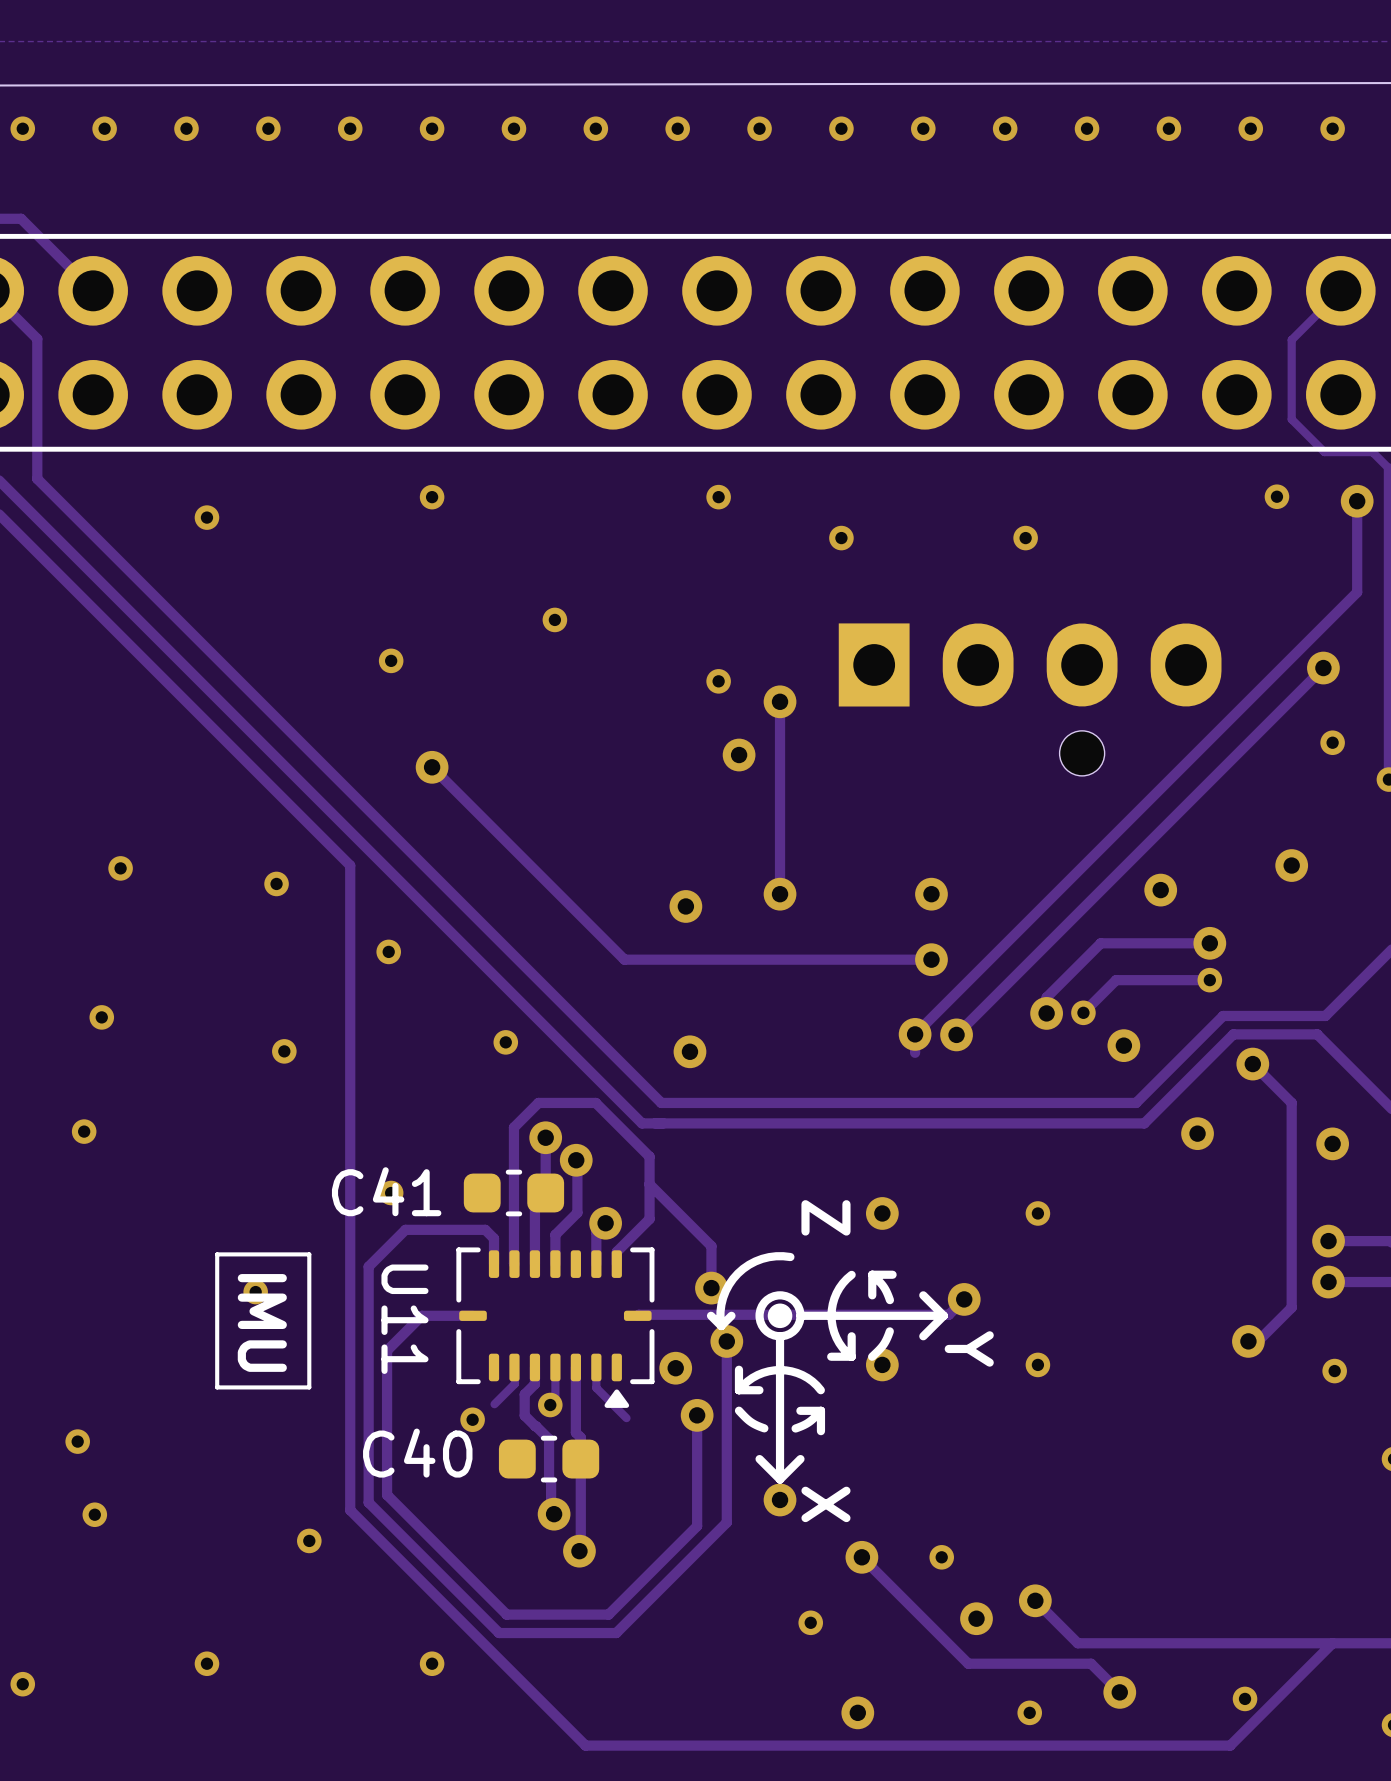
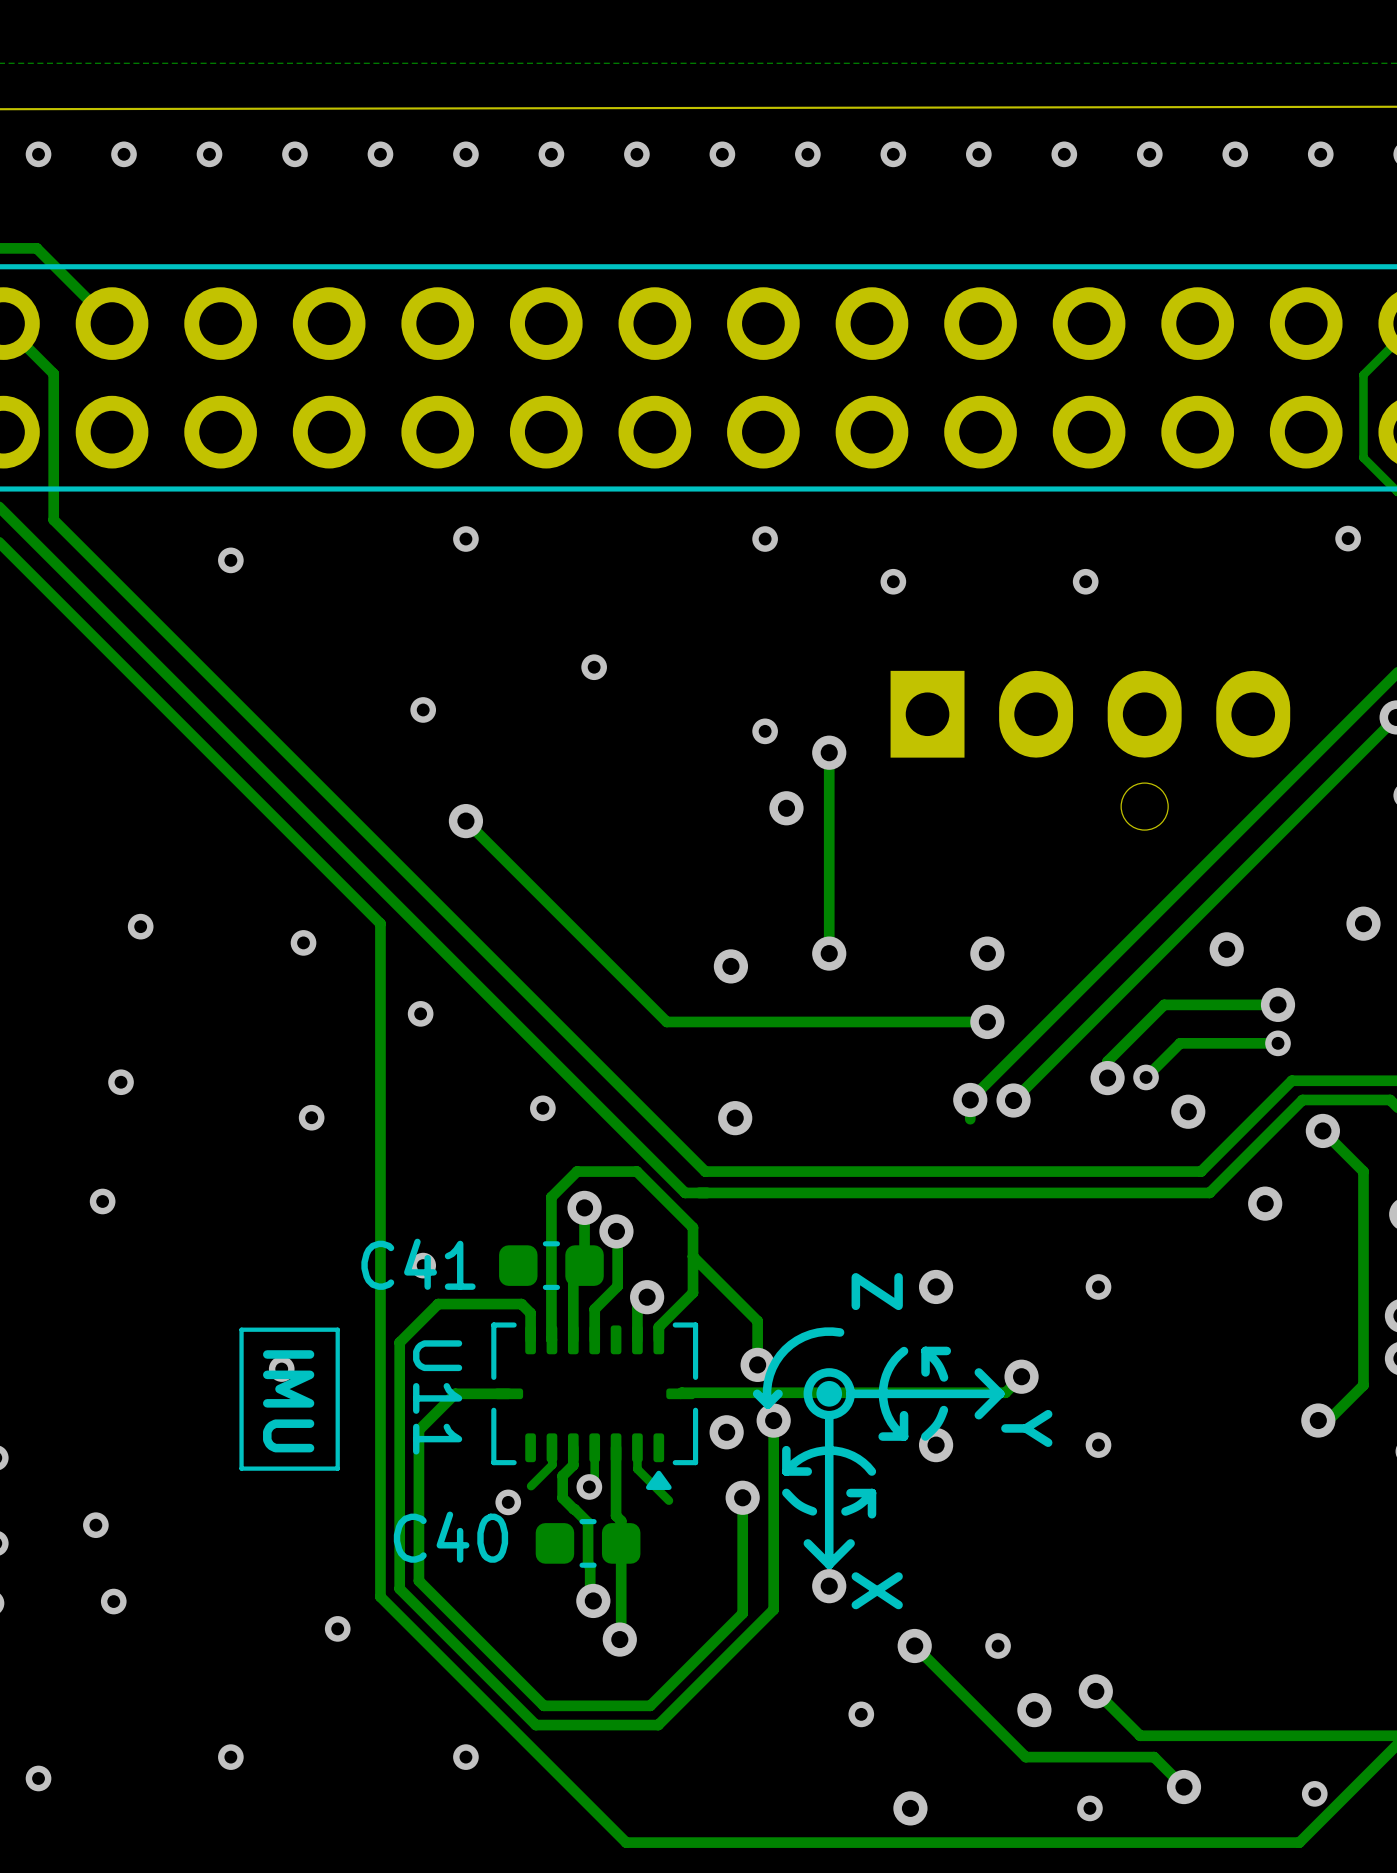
via position: (675, 1368) -> (726, 1432)

